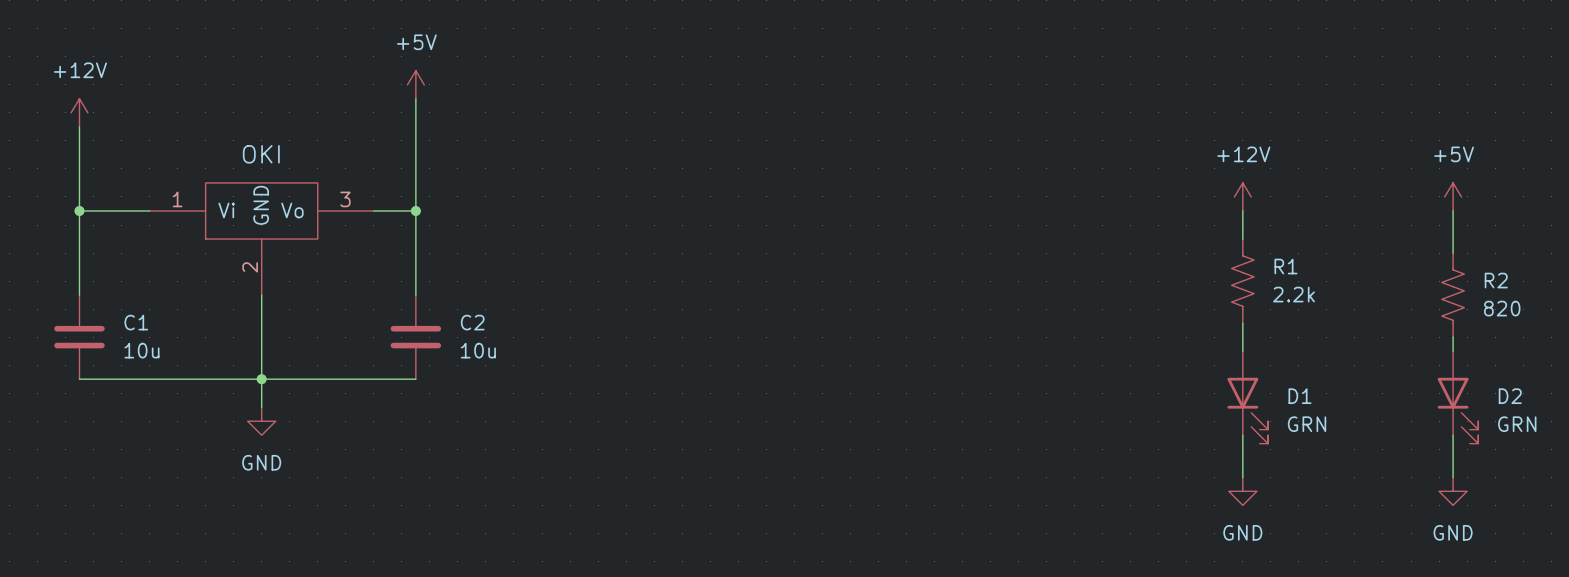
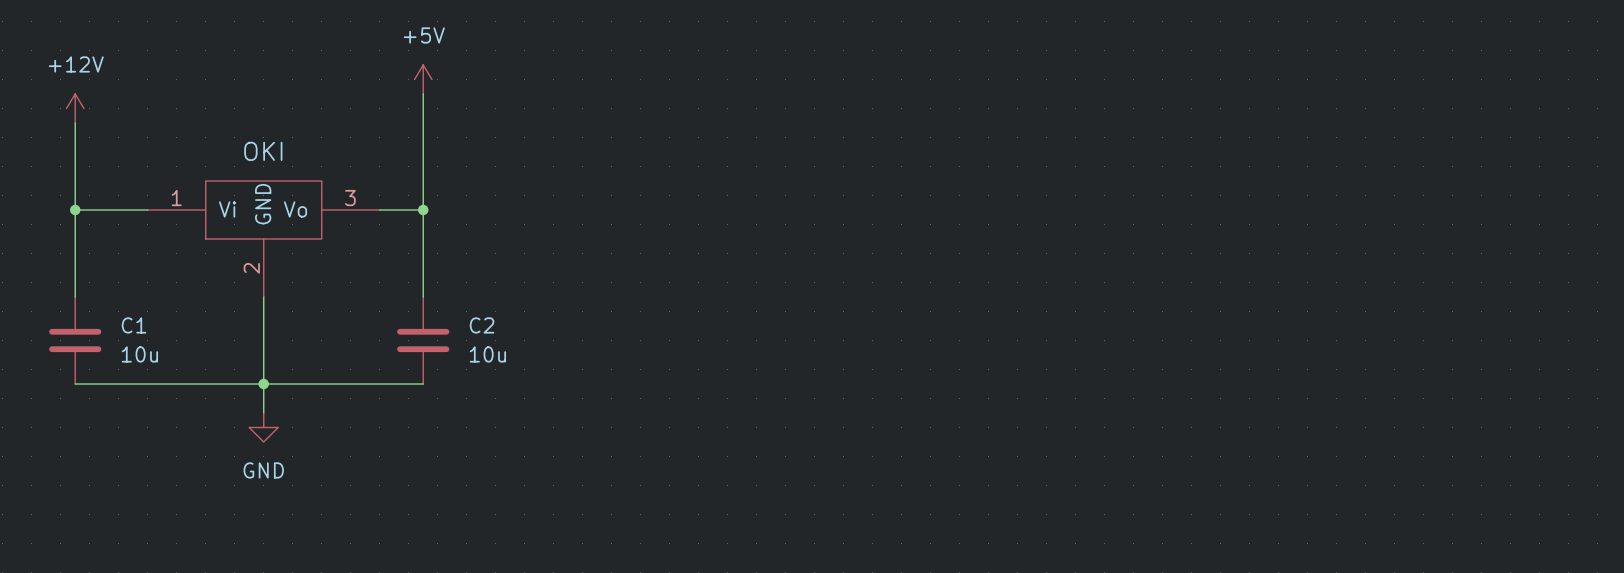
power symbol: +12V (1242, 196) -> none
power symbol: +5V (1453, 196) -> none
wire: (1242, 210) (1242, 239) -> none
wire: (1453, 210) (1453, 253) -> none
R1: 2.2k (1242, 281) -> none
R2: 820 (1453, 295) -> none
wire: (1242, 323) (1242, 351) -> none
wire: (1453, 337) (1453, 351) -> none
D1: GRN (1247, 397) -> none
D2: GRN (1457, 397) -> none
wire: (1242, 435) (1242, 477) -> none
wire: (1453, 435) (1453, 477) -> none
power symbol: GND (1242, 491) -> none
power symbol: GND (1453, 491) -> none

